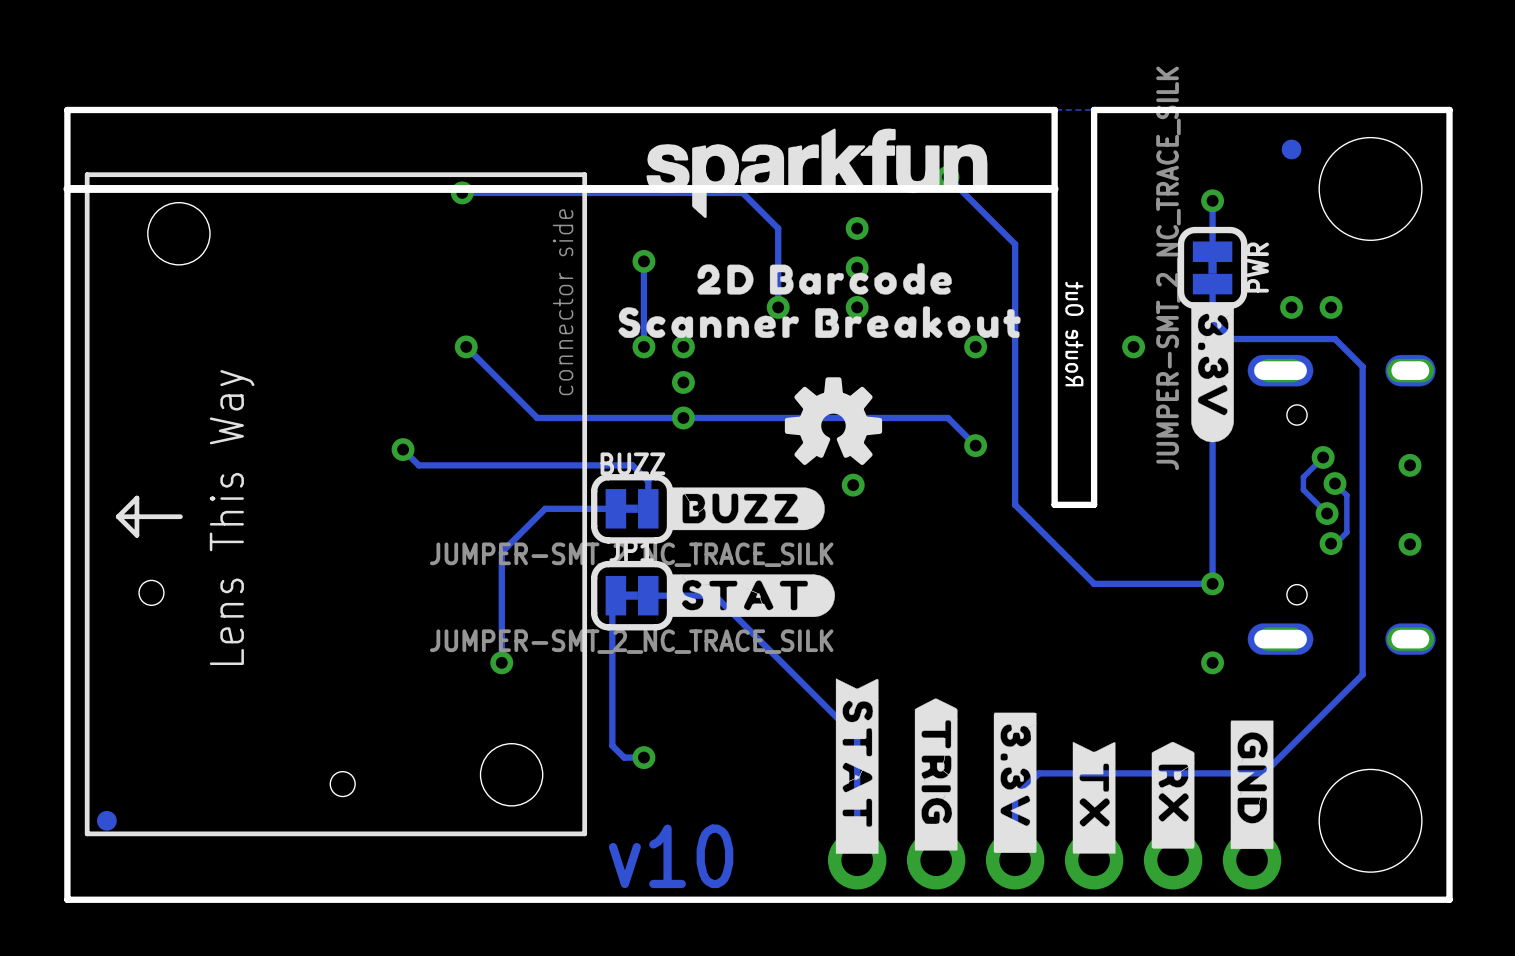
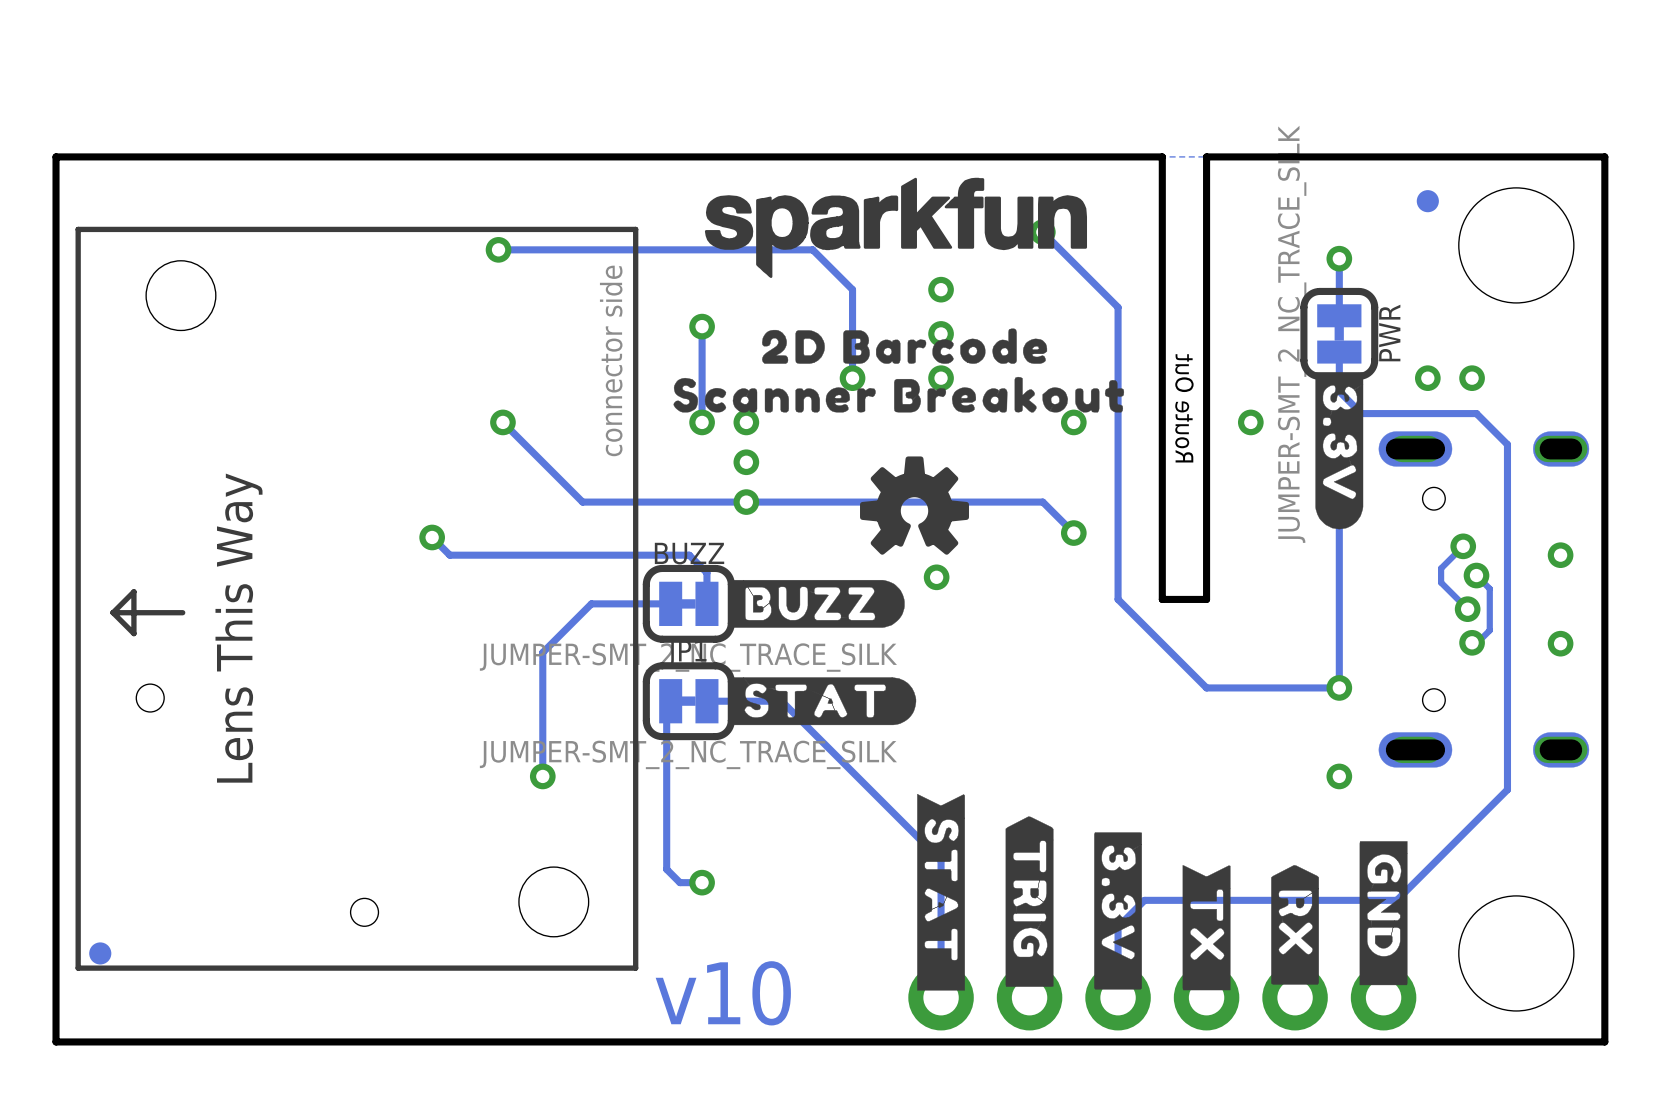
board edge: (1054, 188) (67, 188) -> none

